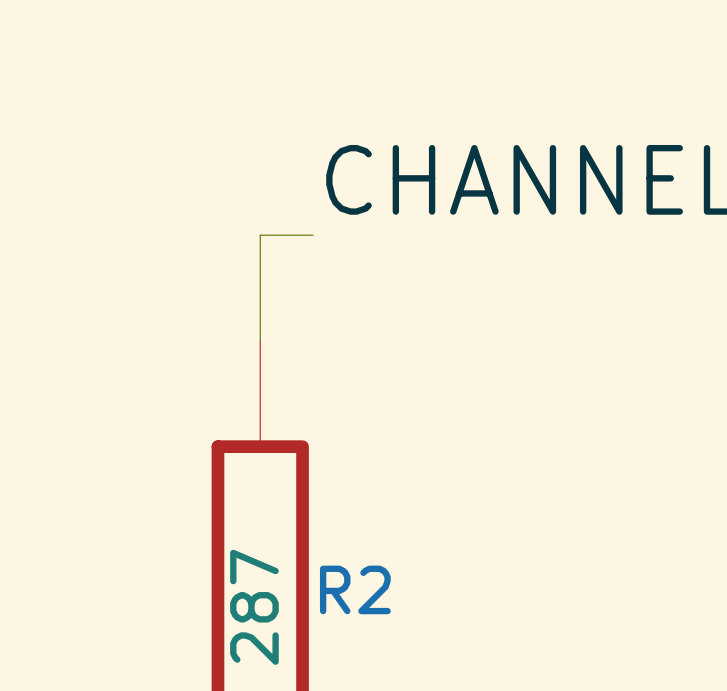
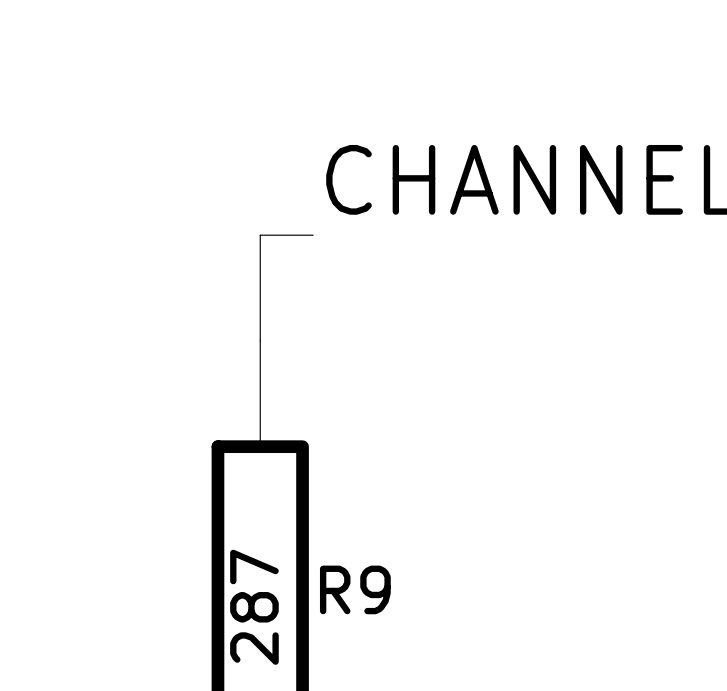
R2 name: R2 (355, 589) -> R9 (355, 589)

